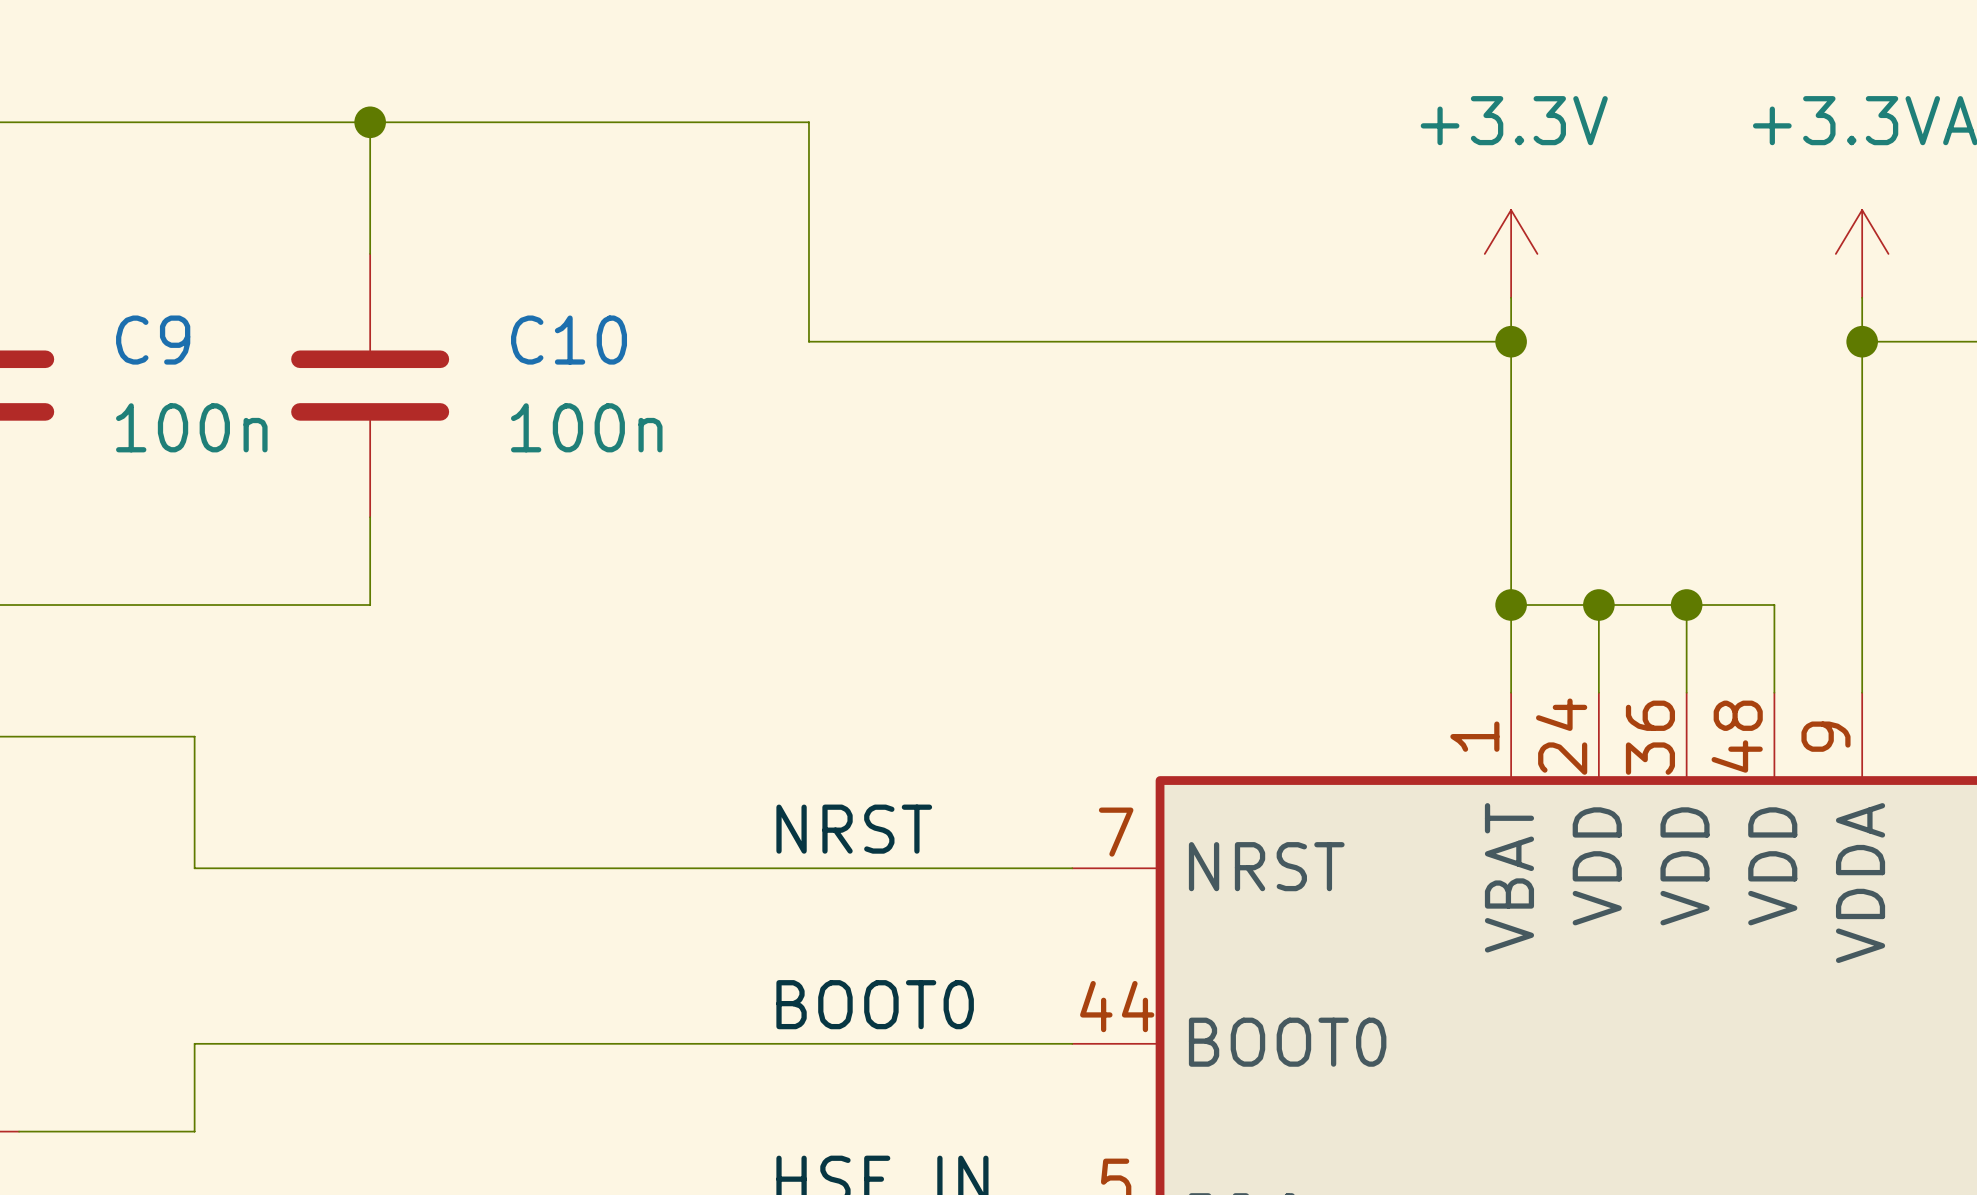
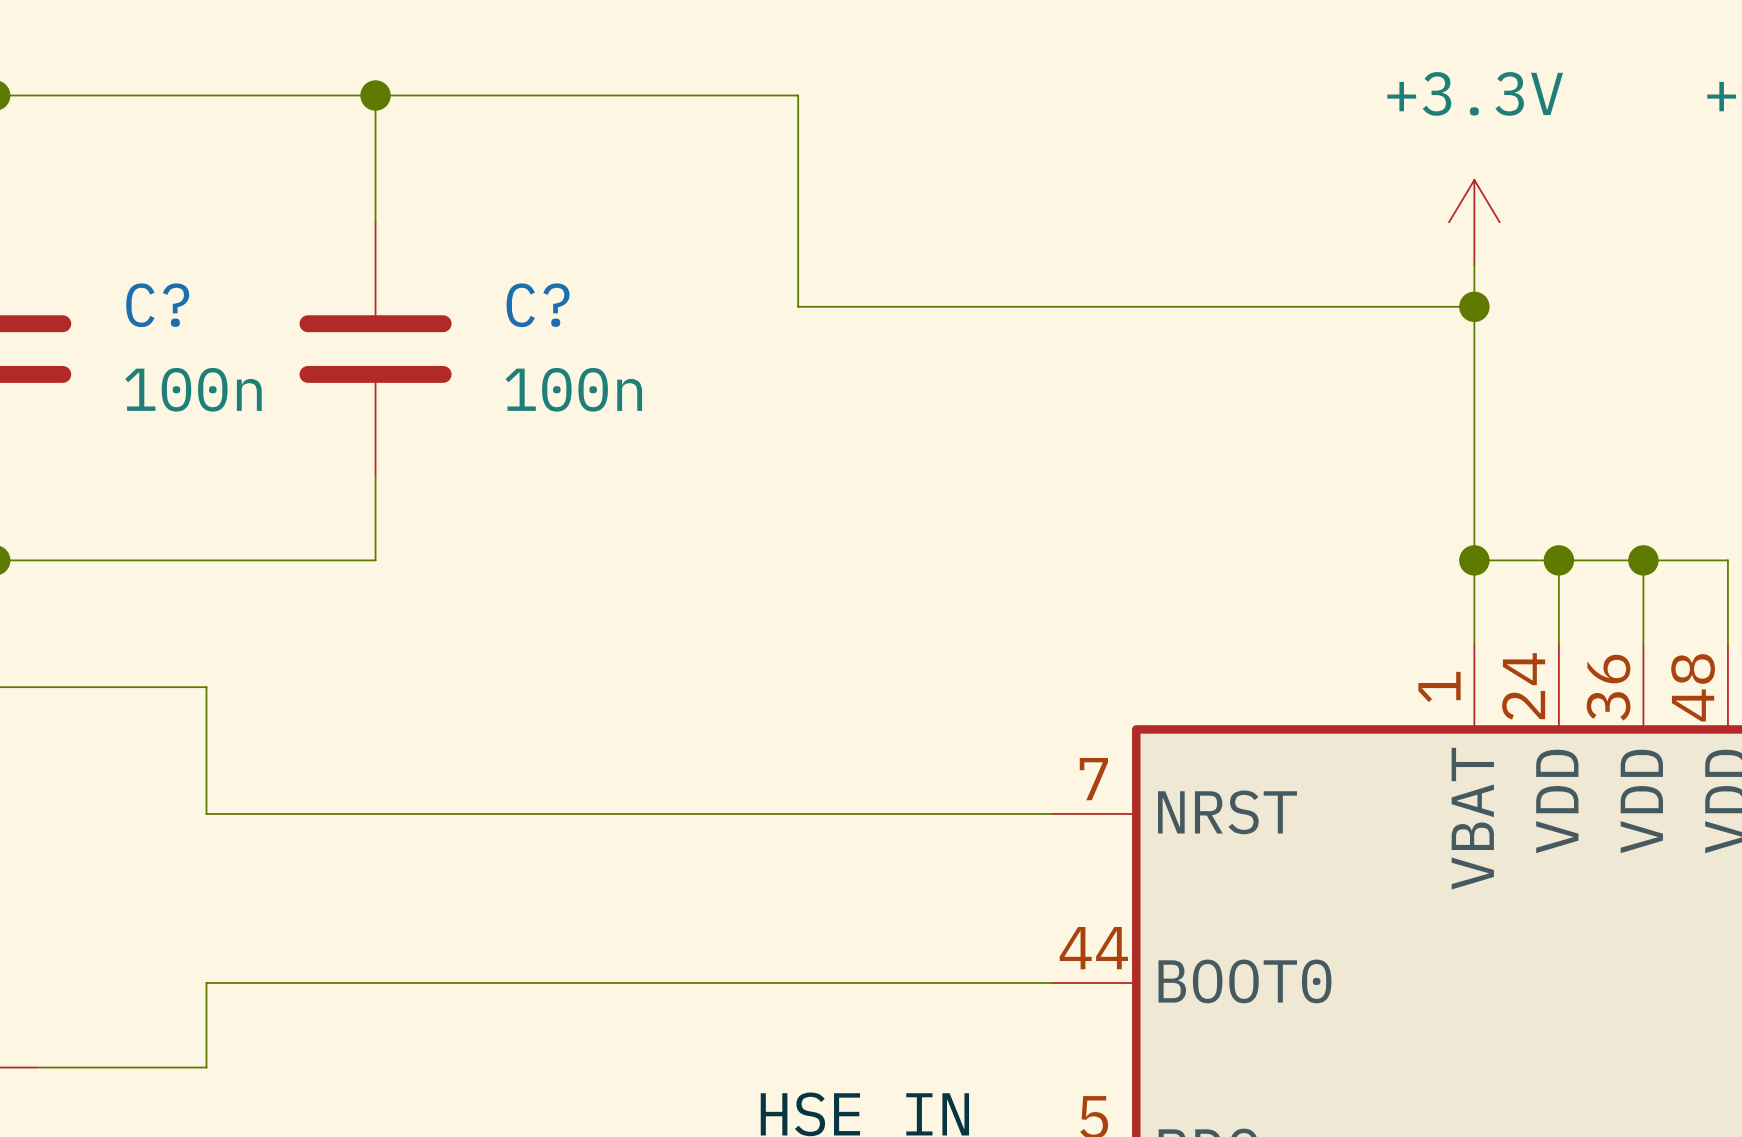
C9 name: C9 (153, 340) -> C? (157, 305)
C10 name: C10 (569, 340) -> C? (538, 305)
label: NRST (854, 829) -> none
label: BOOT0 (875, 1004) -> none

